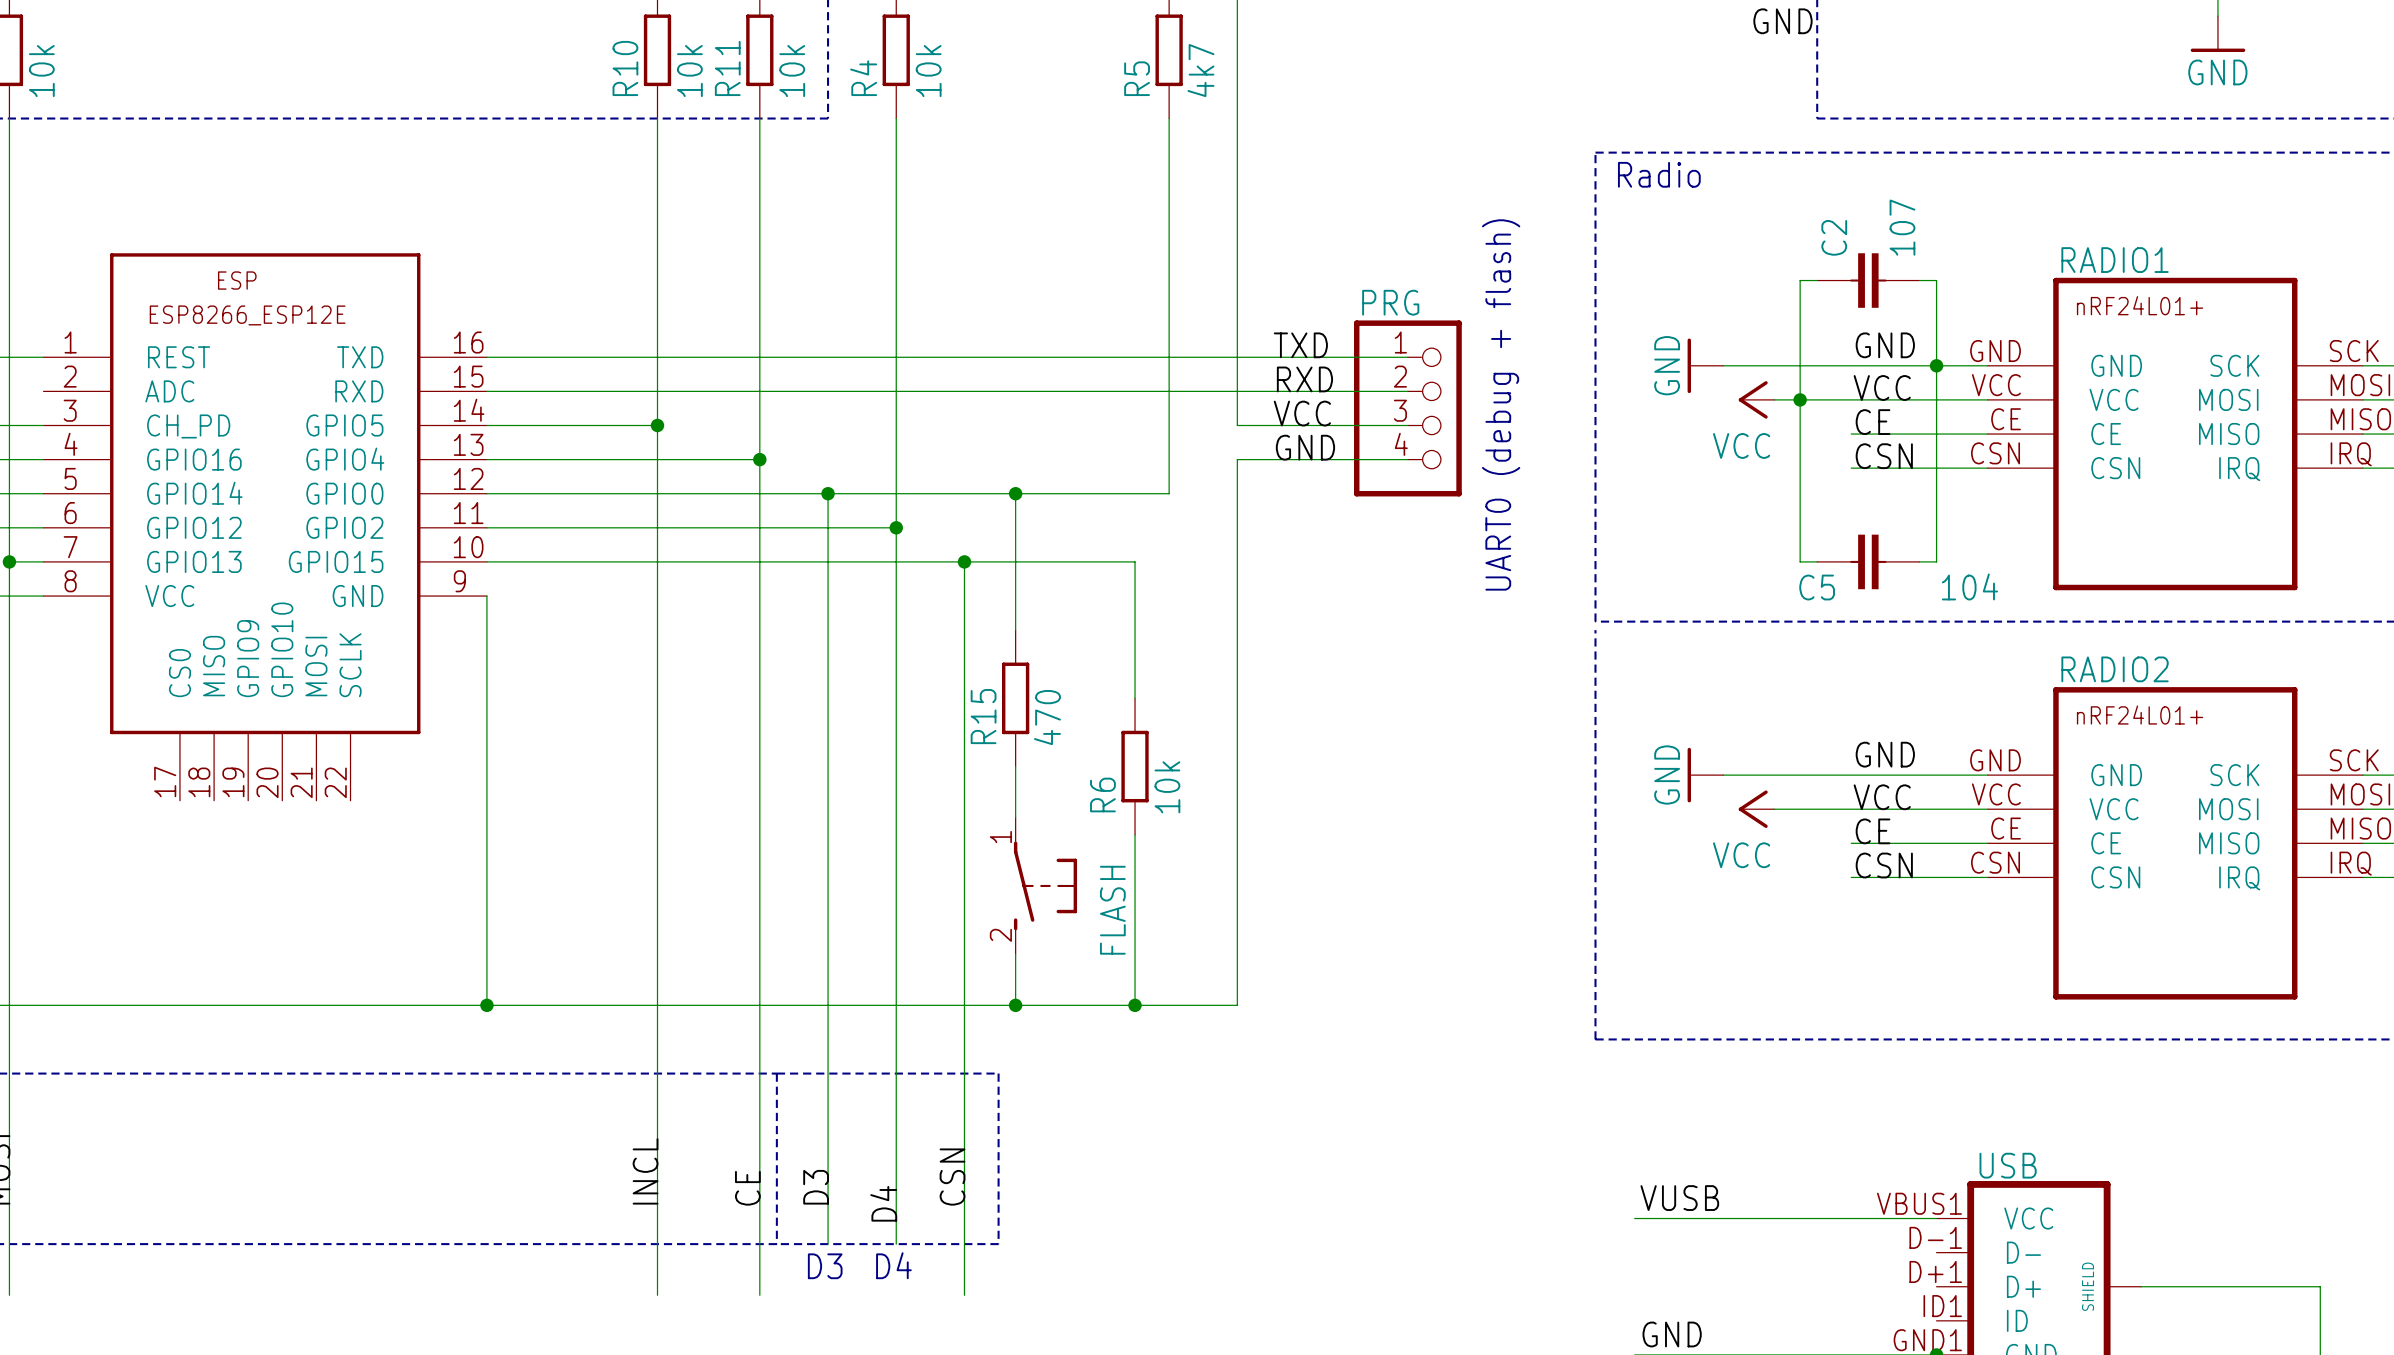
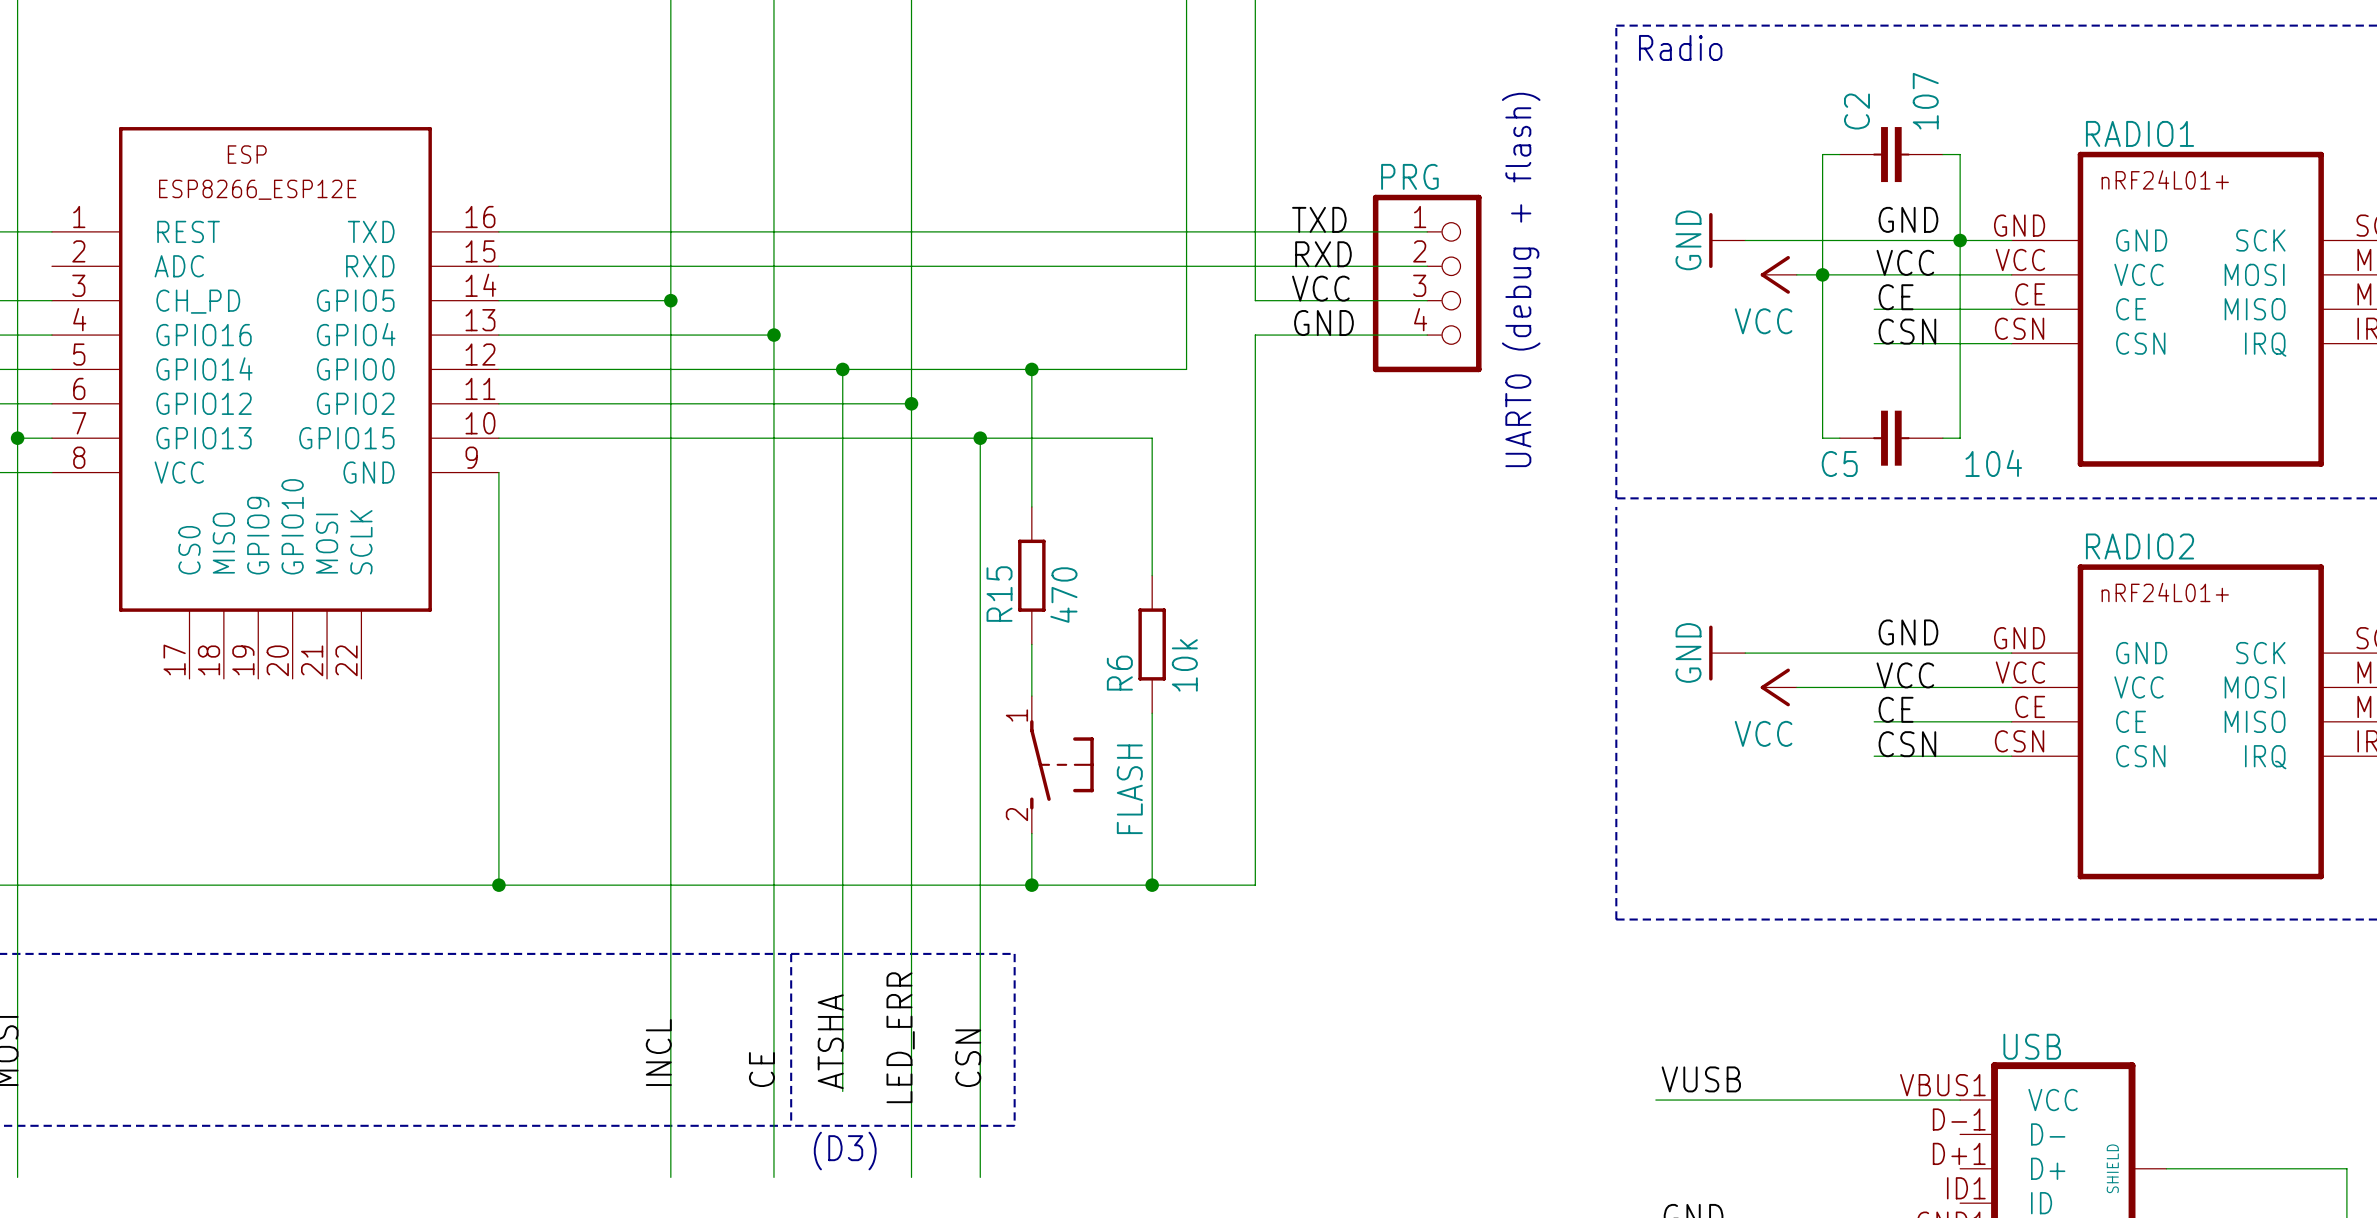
label: D3 (816, 1187) -> ATSHA (830, 1041)
label: D4 (883, 1203) -> LED_ERR (900, 1037)
wire: (828, 1210) (828, 1244) -> none
wire: none -> (911, 1125) (911, 1177)
text: D4 (893, 1265) -> none
text: D3 (825, 1266) -> (D3) (845, 1151)

